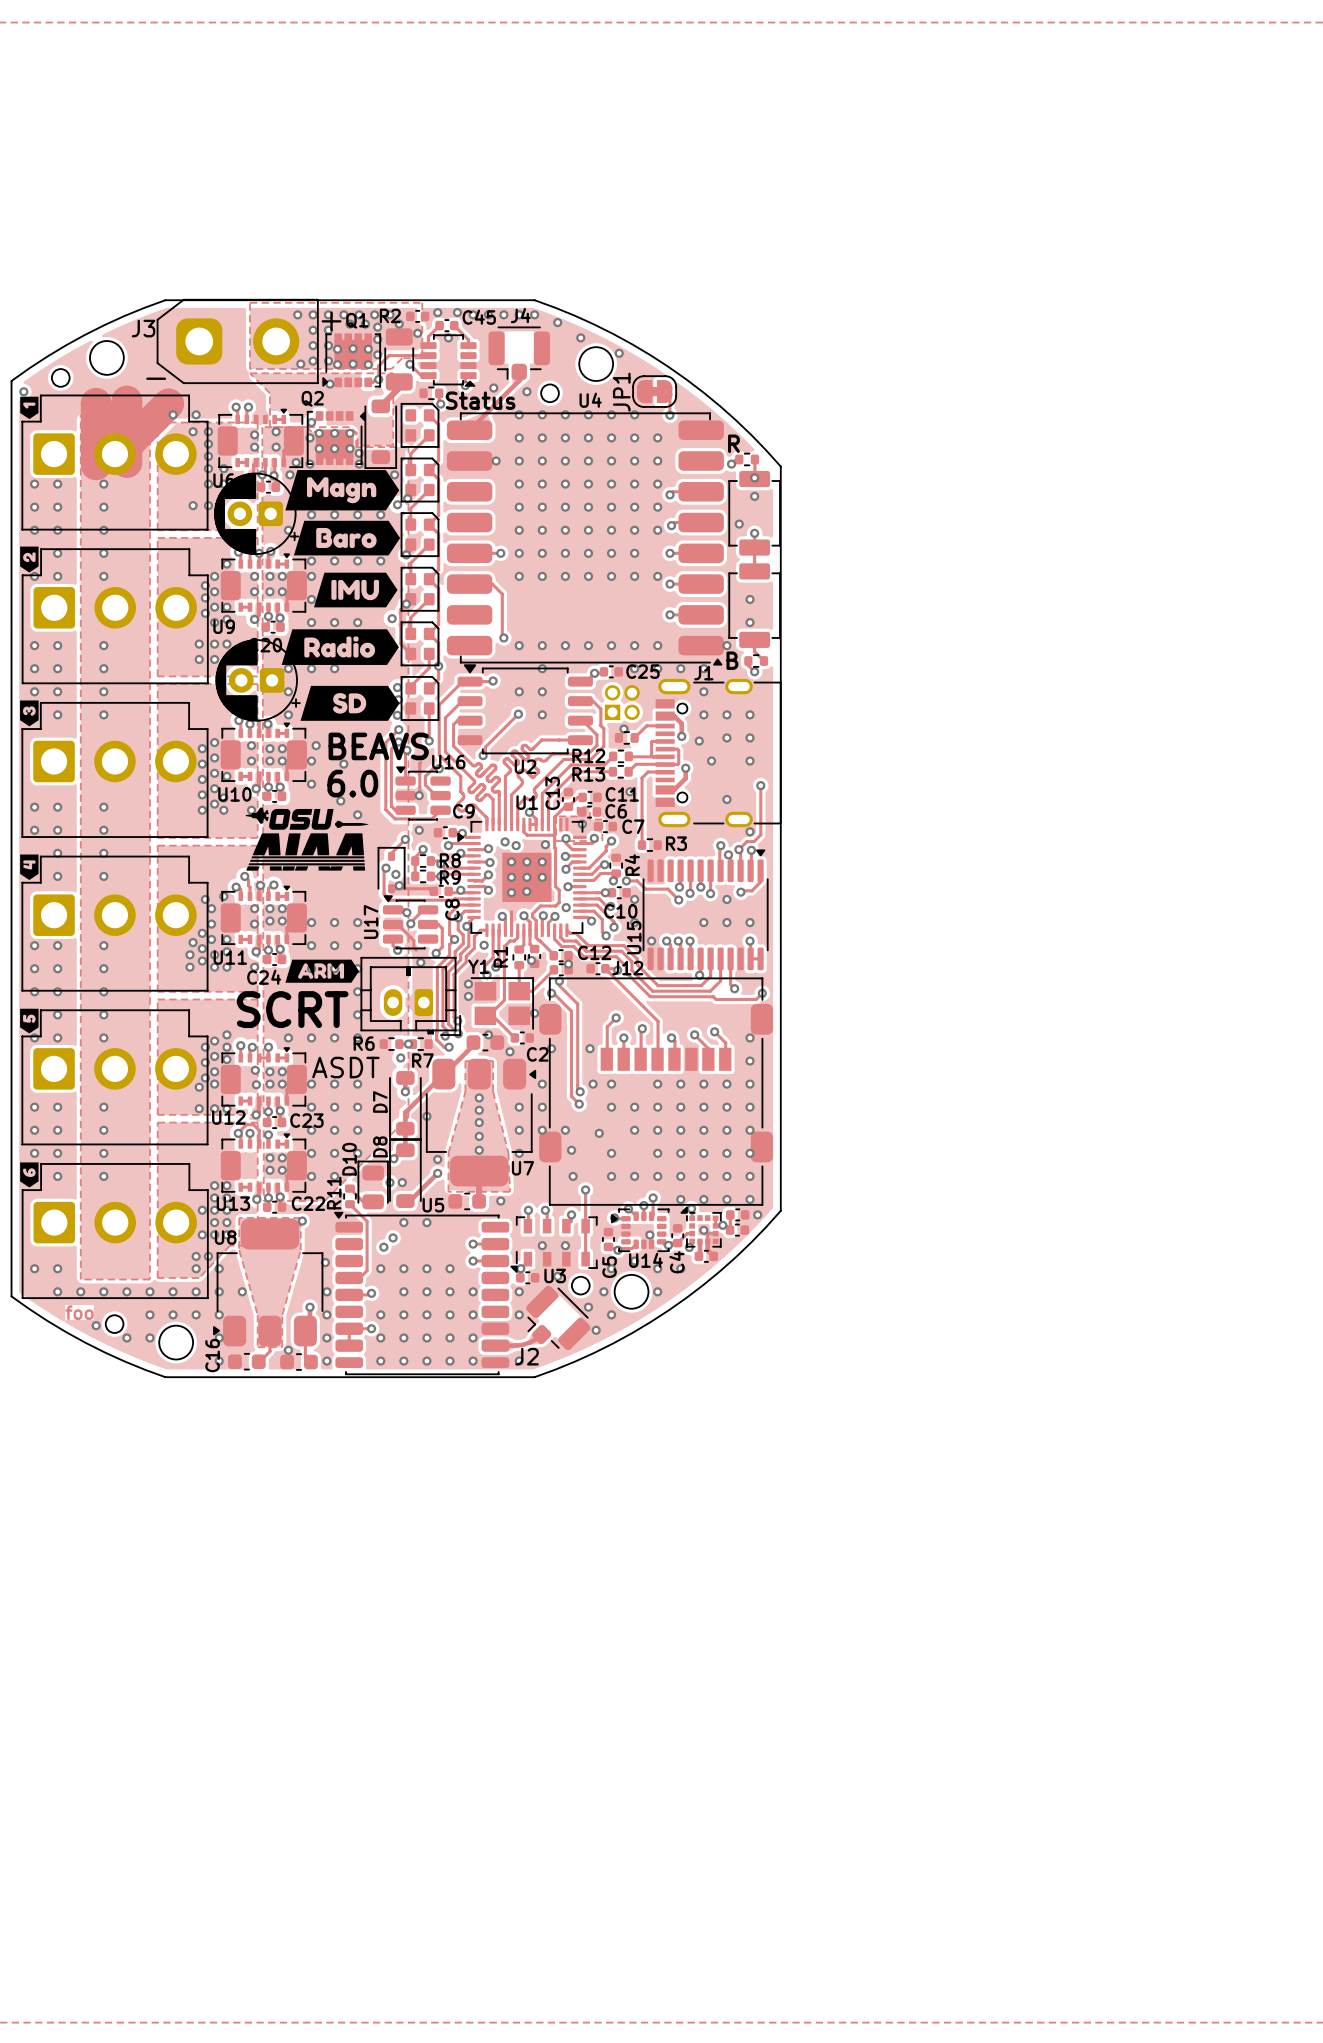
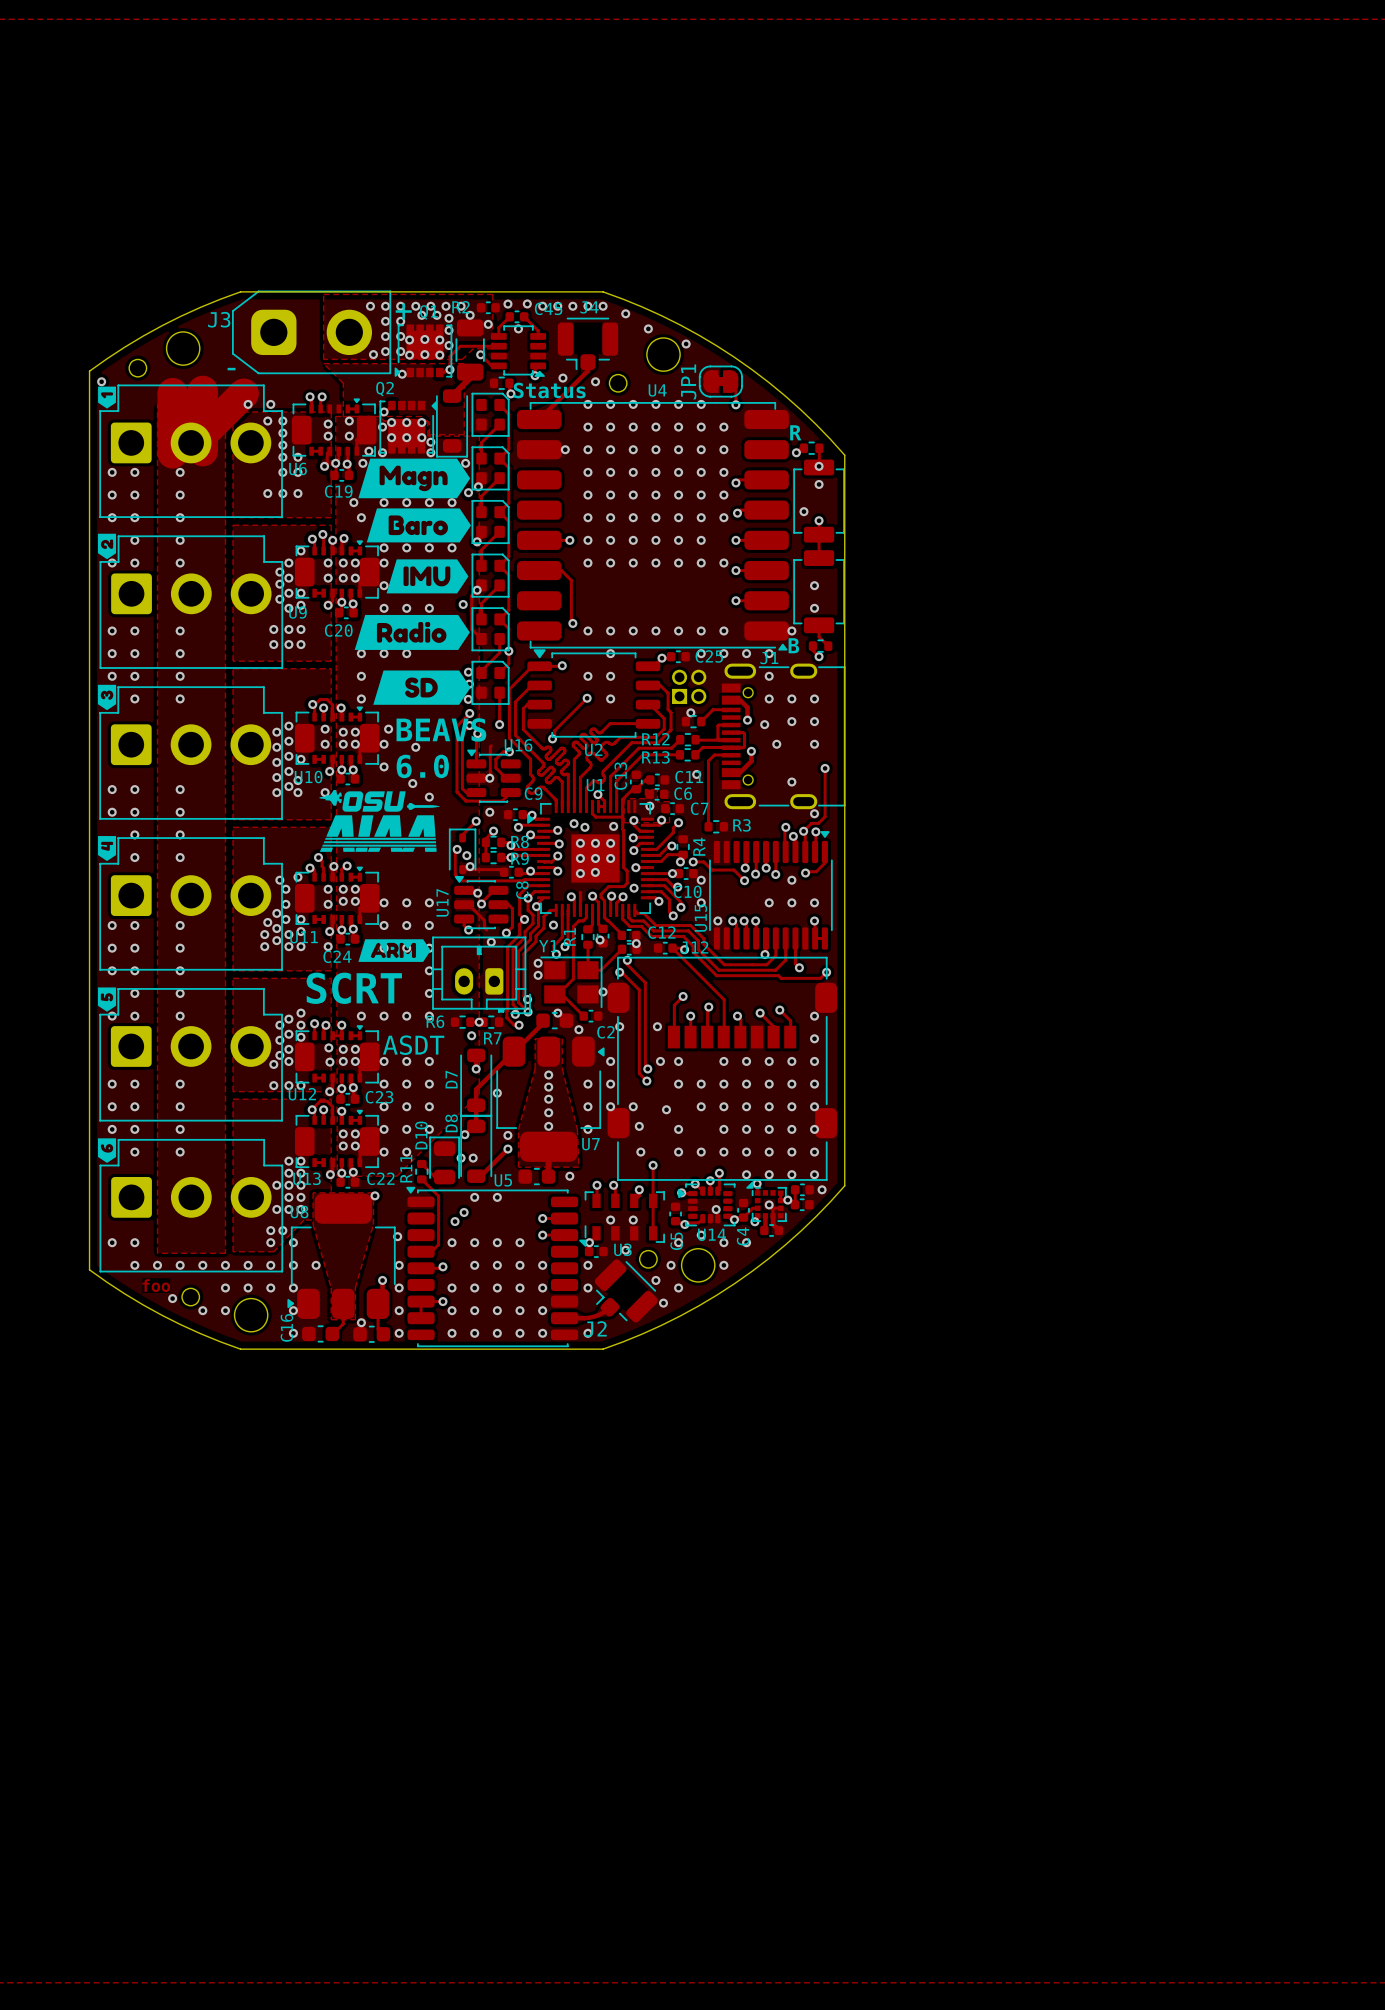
C19 name: none -> C19 (338, 491)
via: none -> (297, 493)
part: (256, 513) -> none
via: none -> (353, 502)
via: none -> (300, 644)
part: (258, 680) -> none

